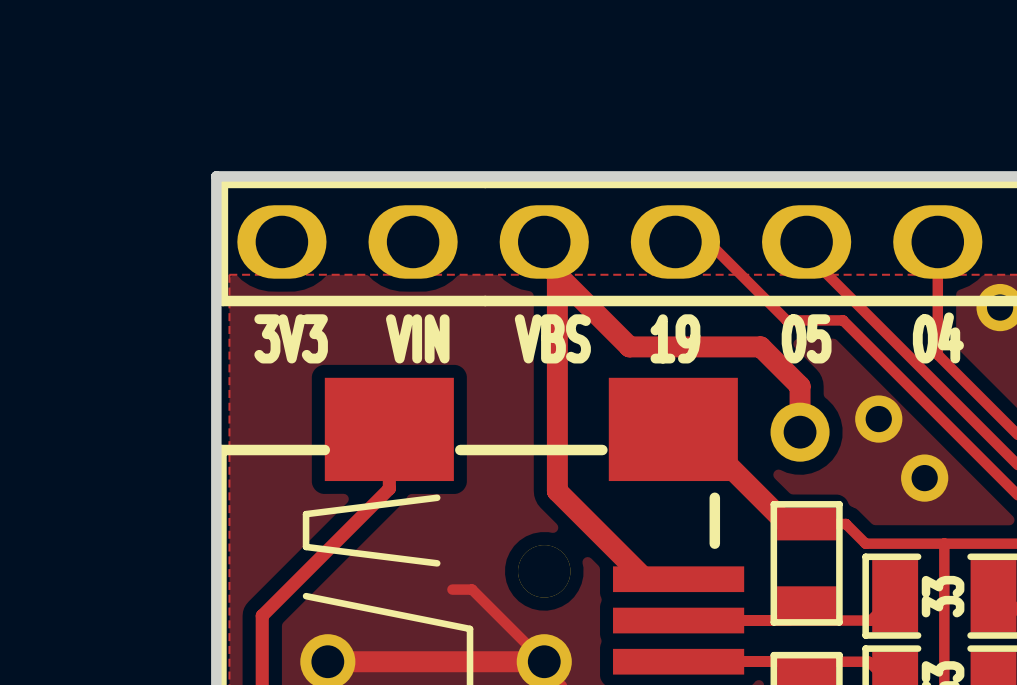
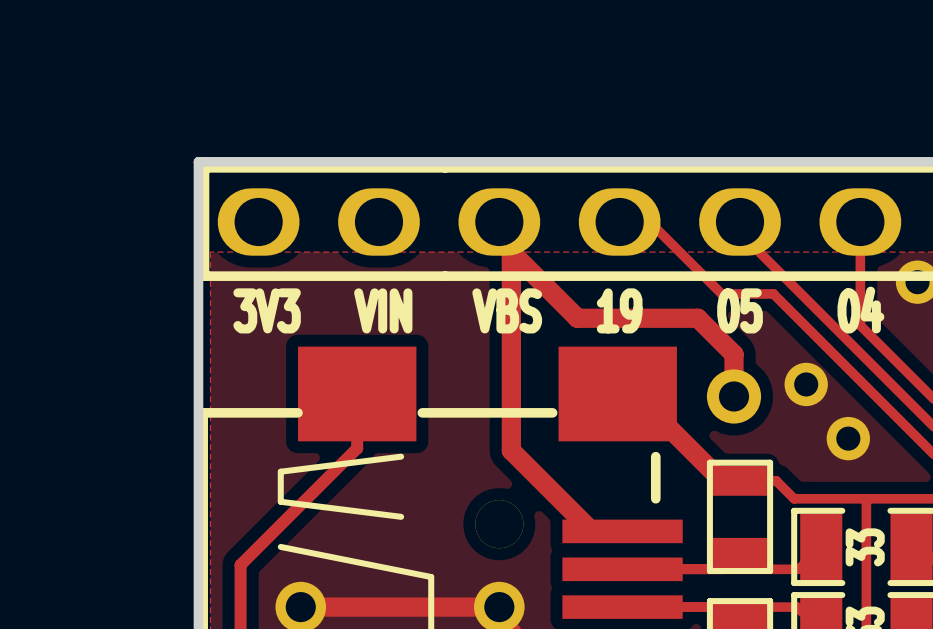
track: (452, 589) (472, 589) (544, 661) -> none

